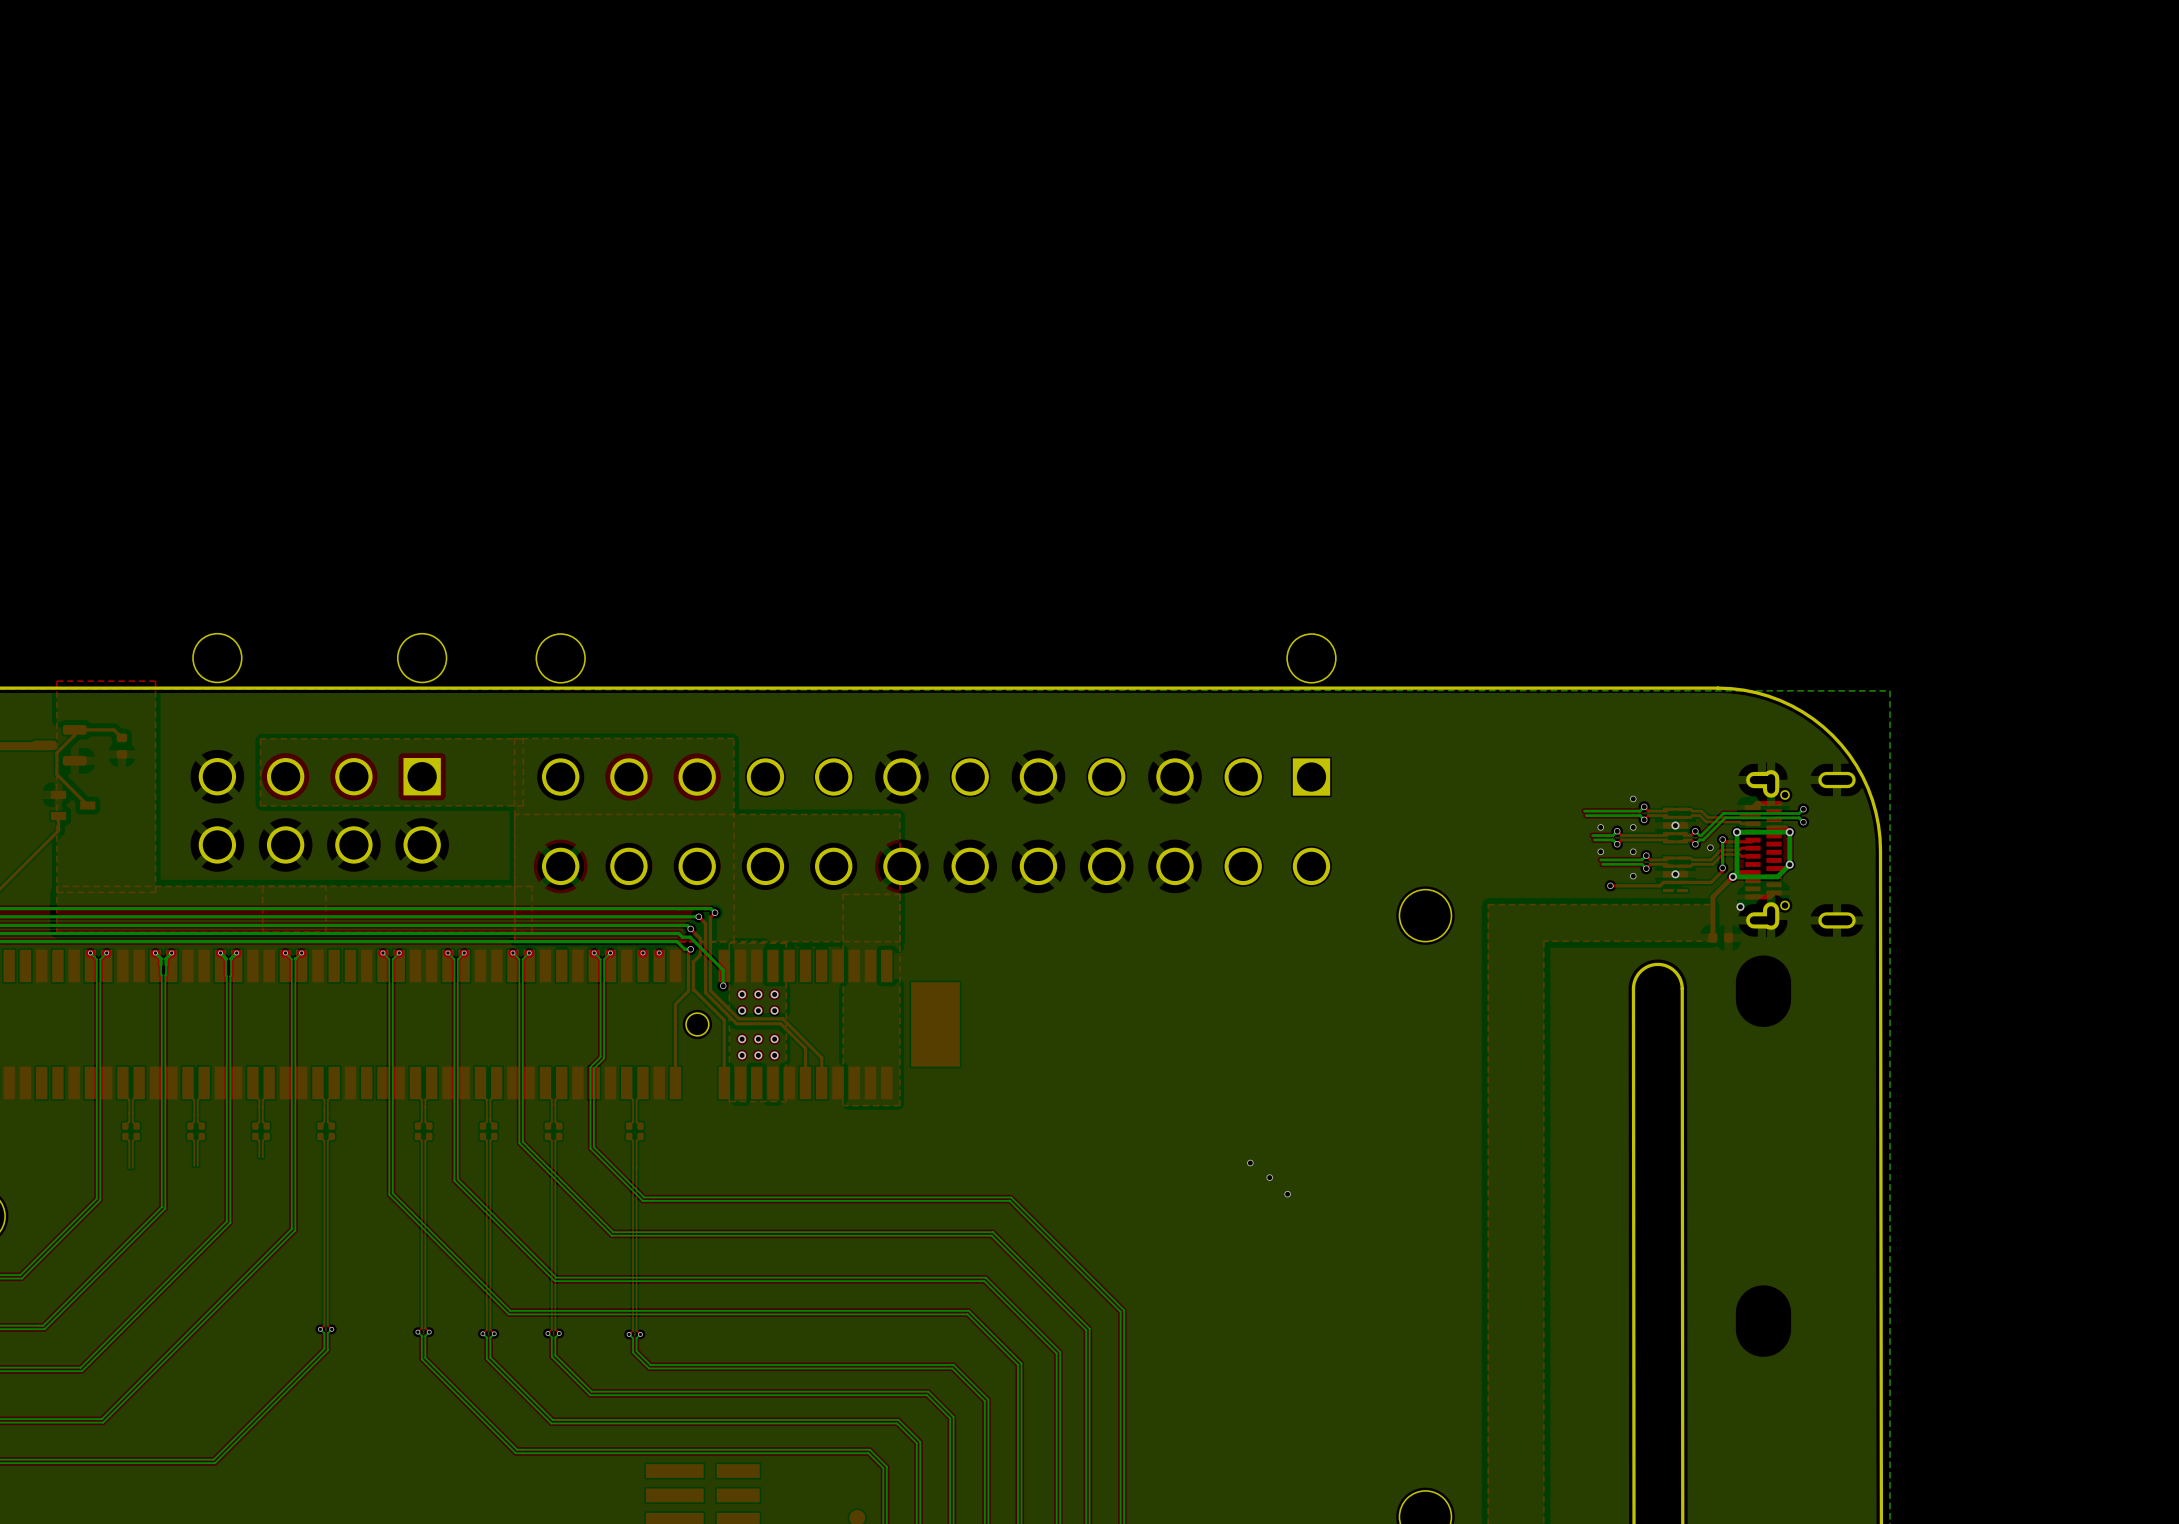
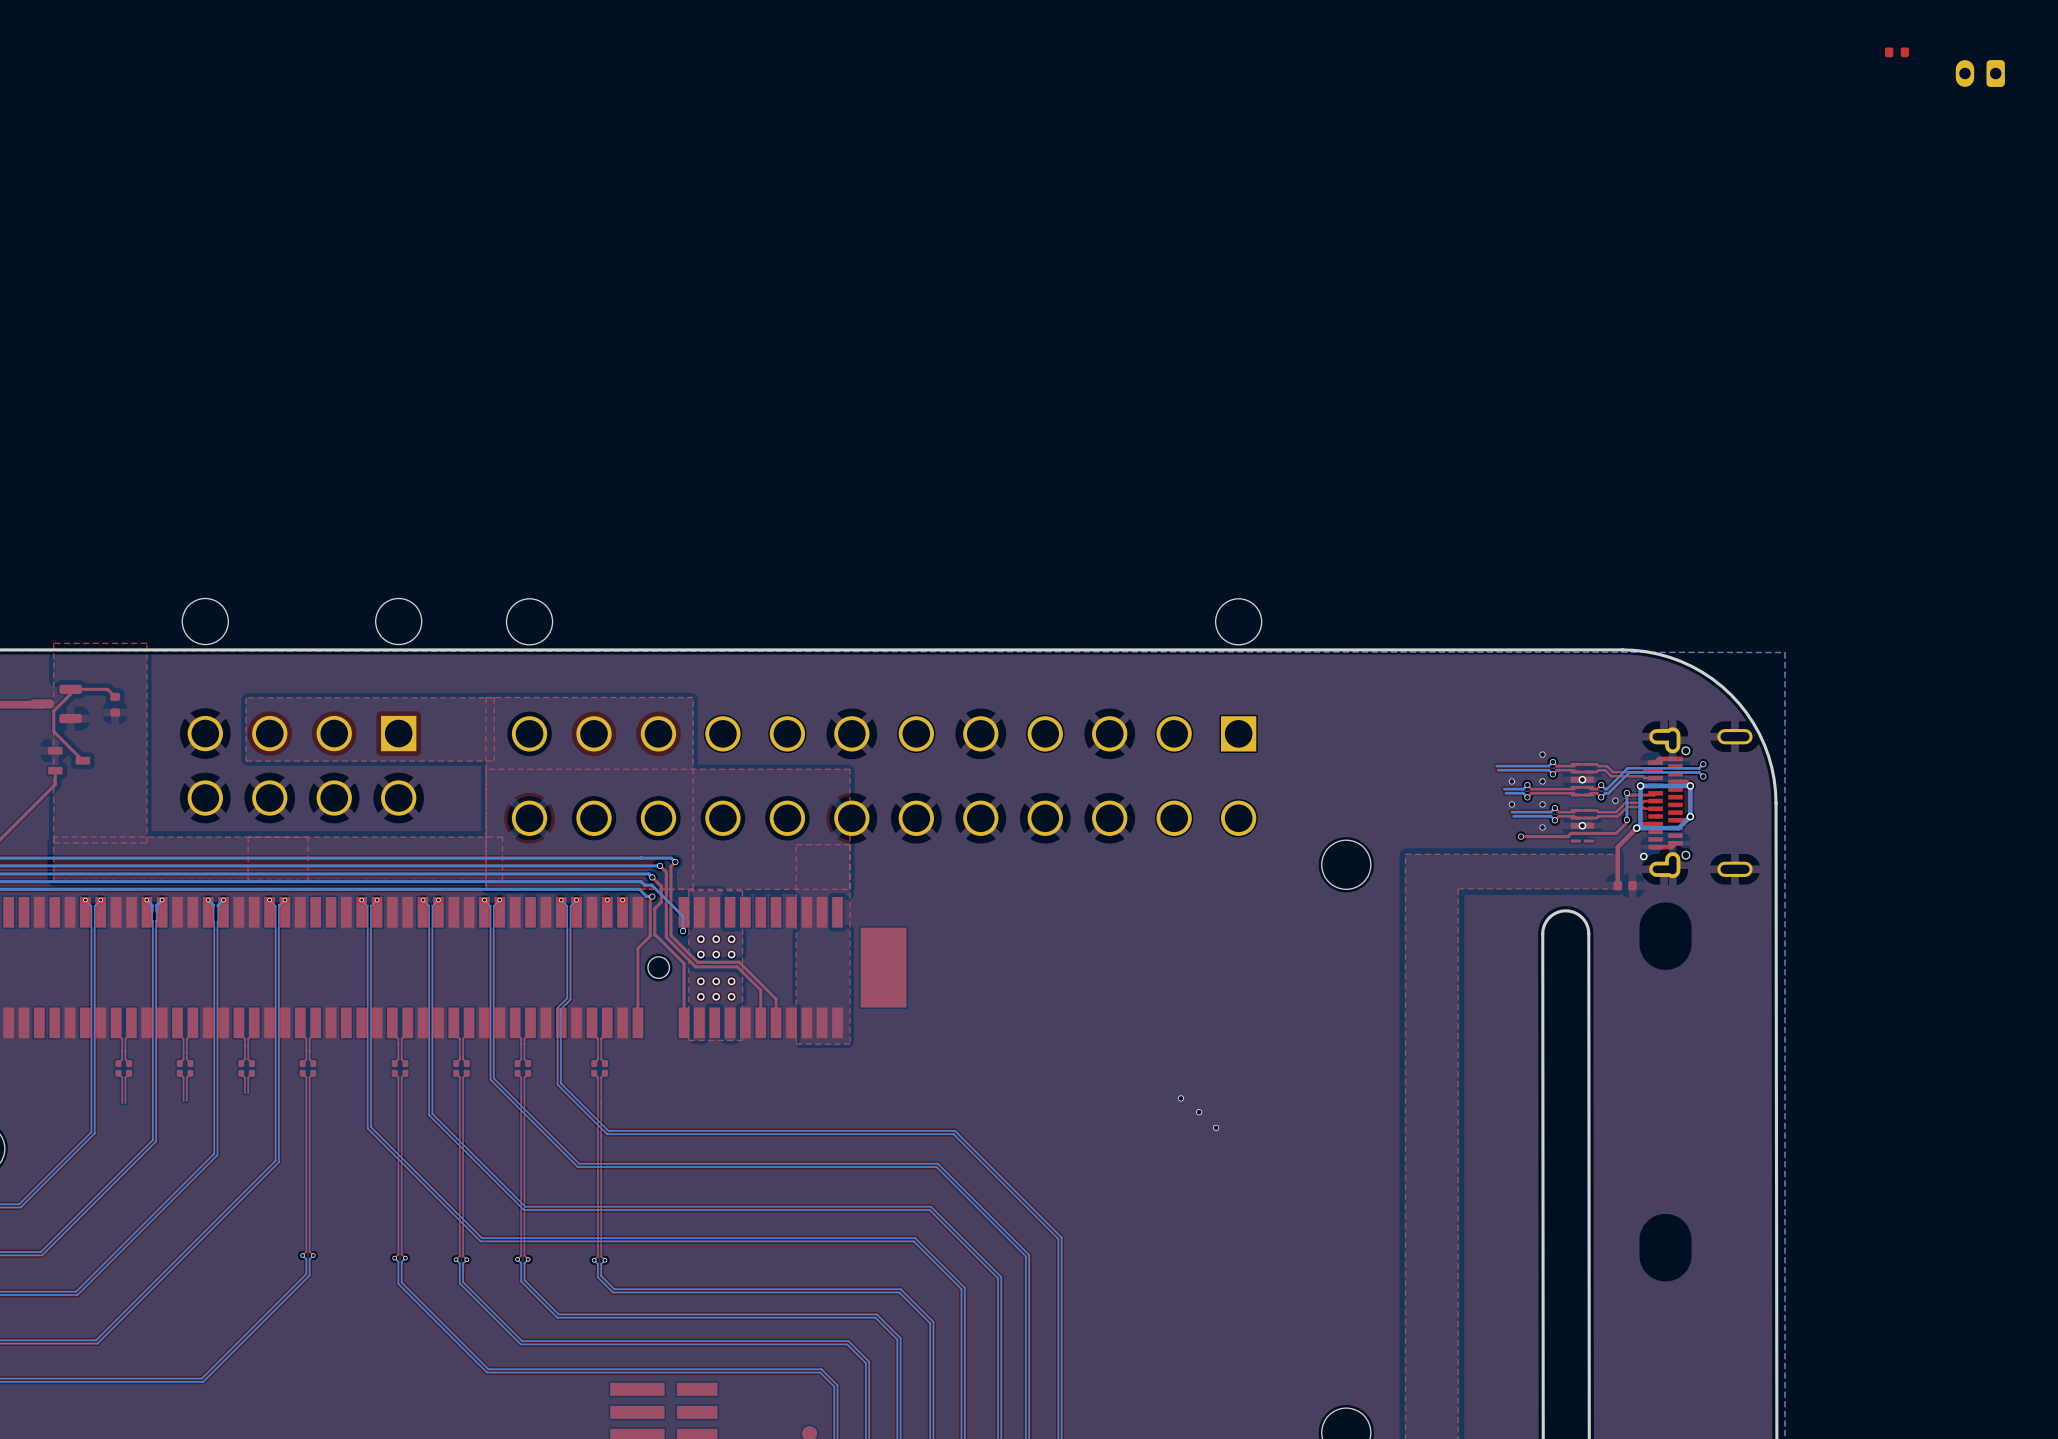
part: none -> (1897, 52)
part: none -> (1980, 73)

